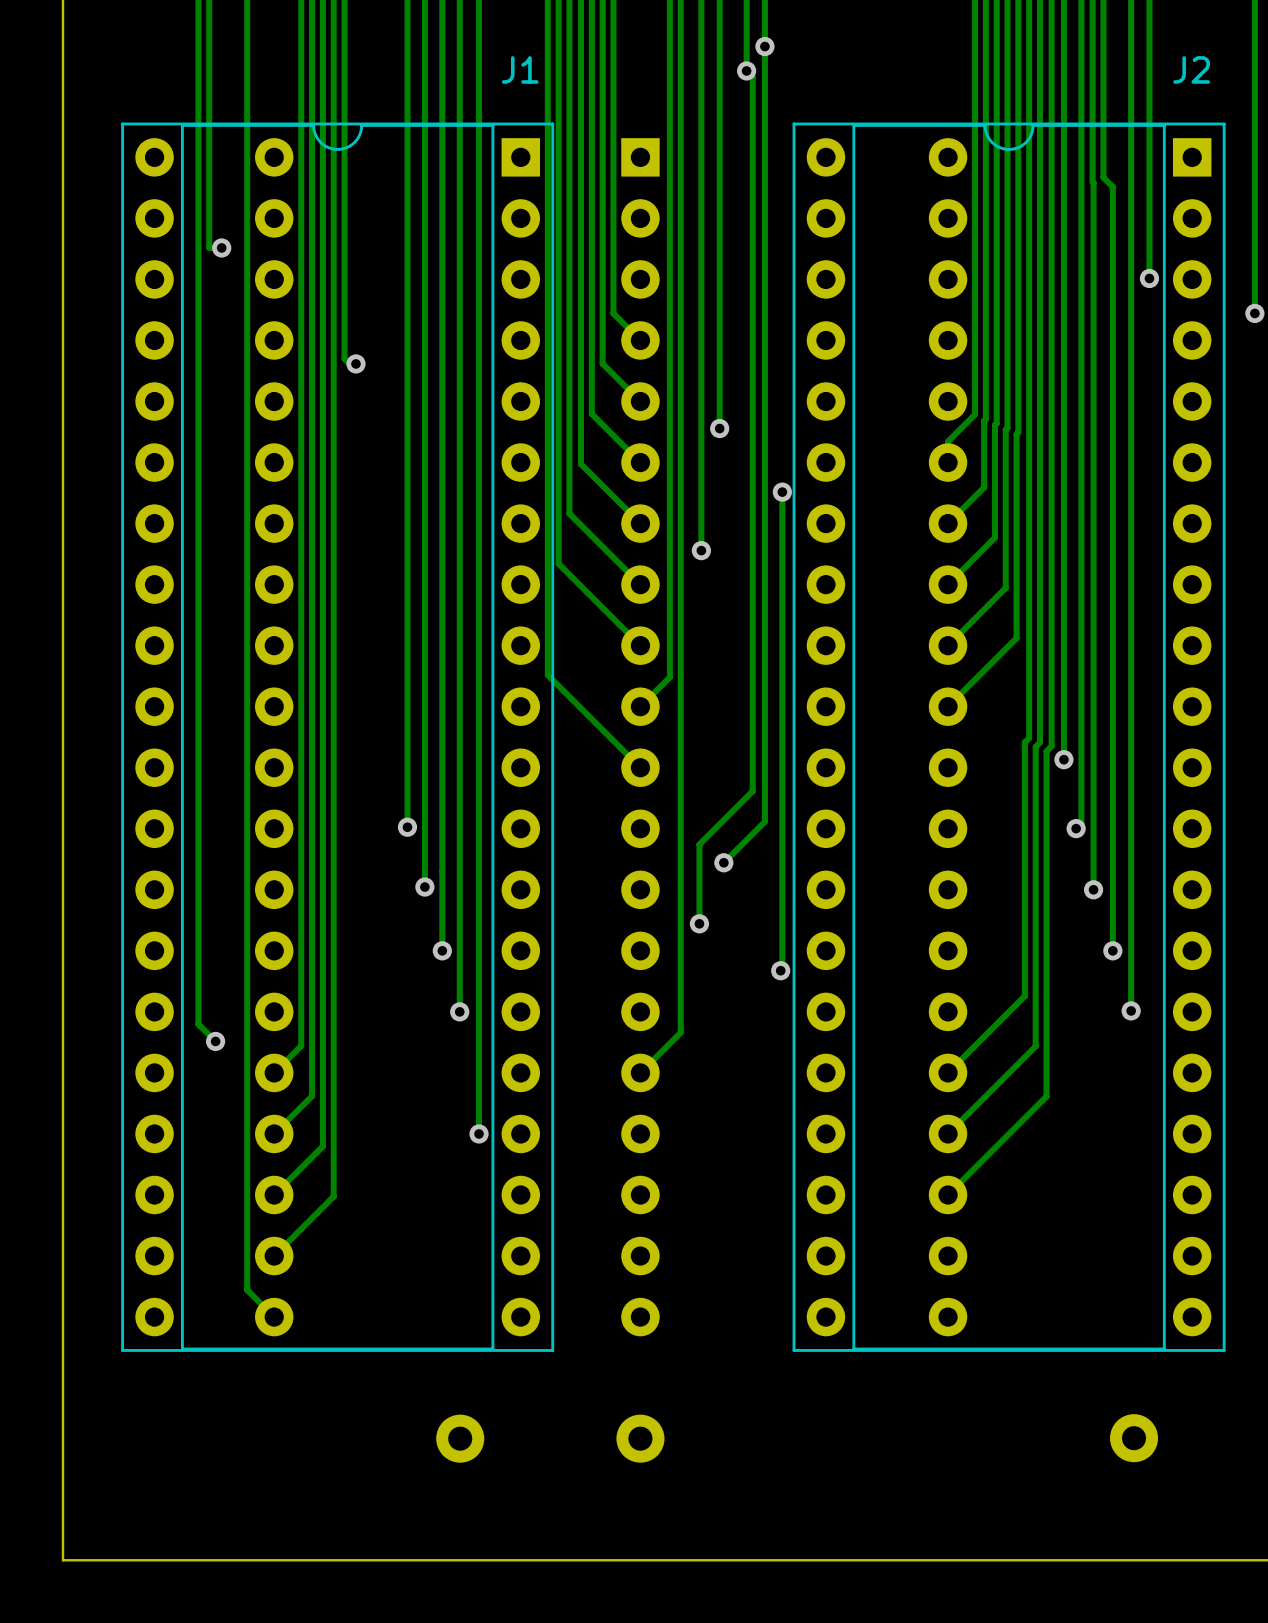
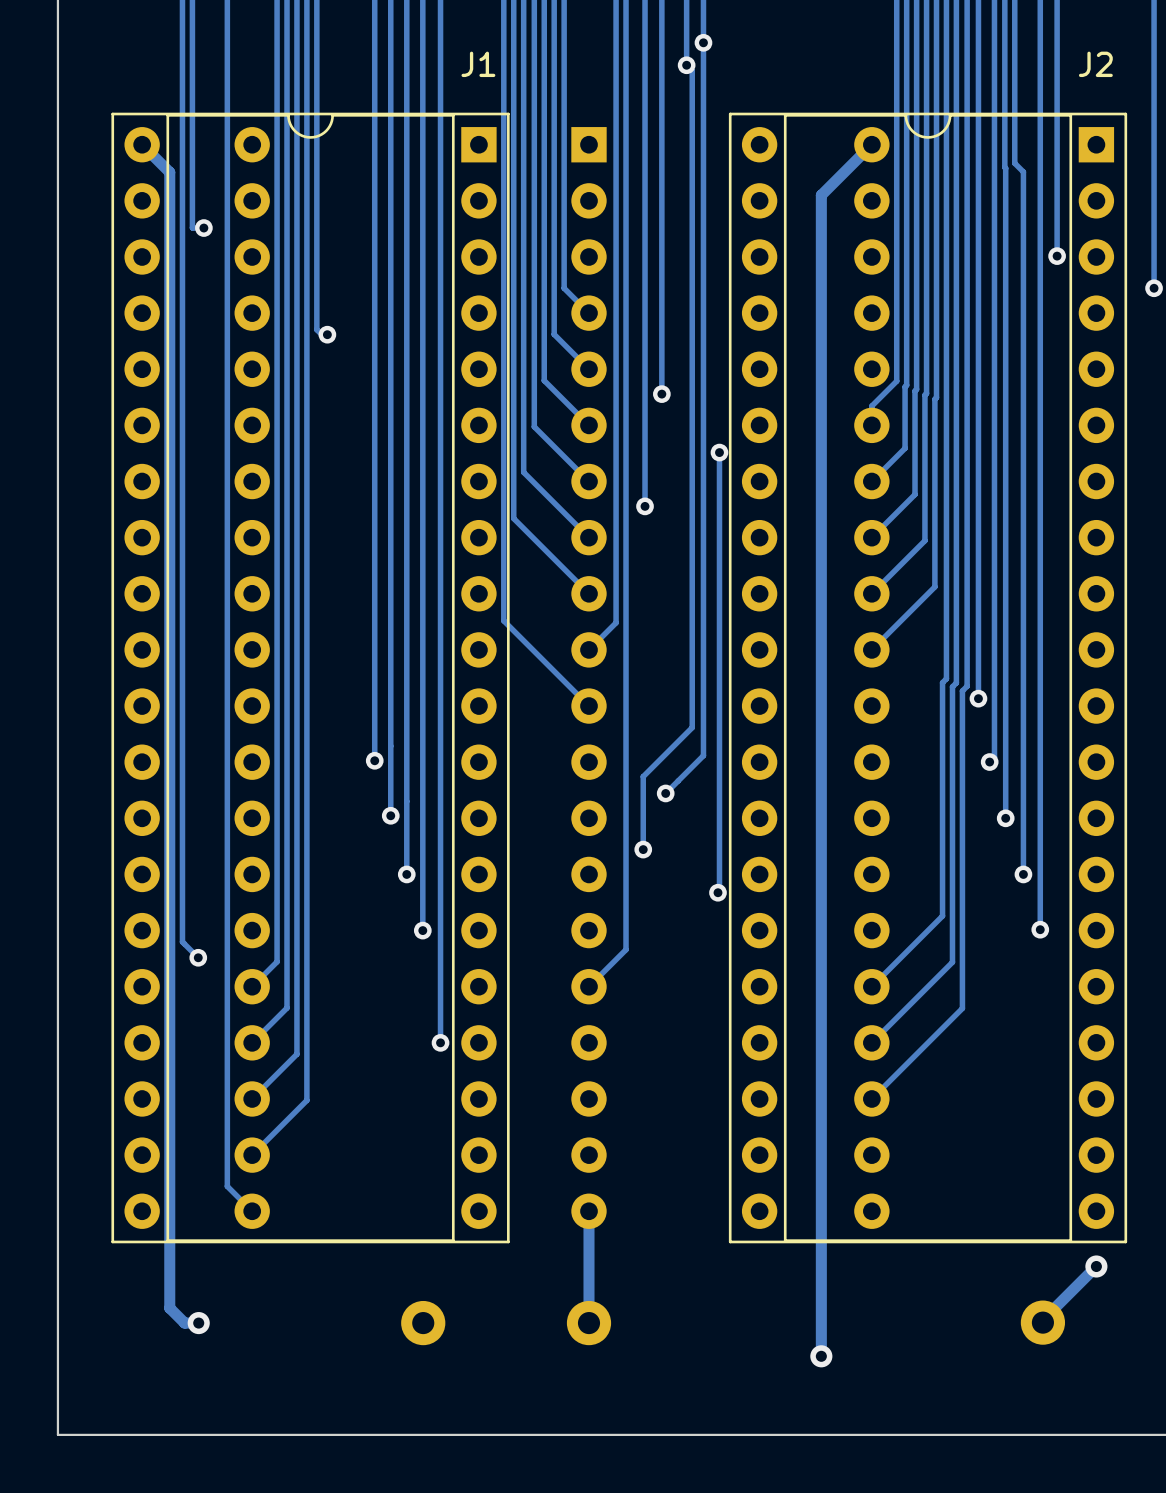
track: none -> (142, 144) (169, 172) (169, 1308) (184, 1323) (198, 1323)
track: none -> (871, 144) (821, 195) (821, 1356)
track: none -> (588, 1211) (588, 1323)
track: none -> (1096, 1266) (1042, 1319)
via: none -> (1096, 1266)
via: none -> (198, 1323)
via: none -> (821, 1356)

